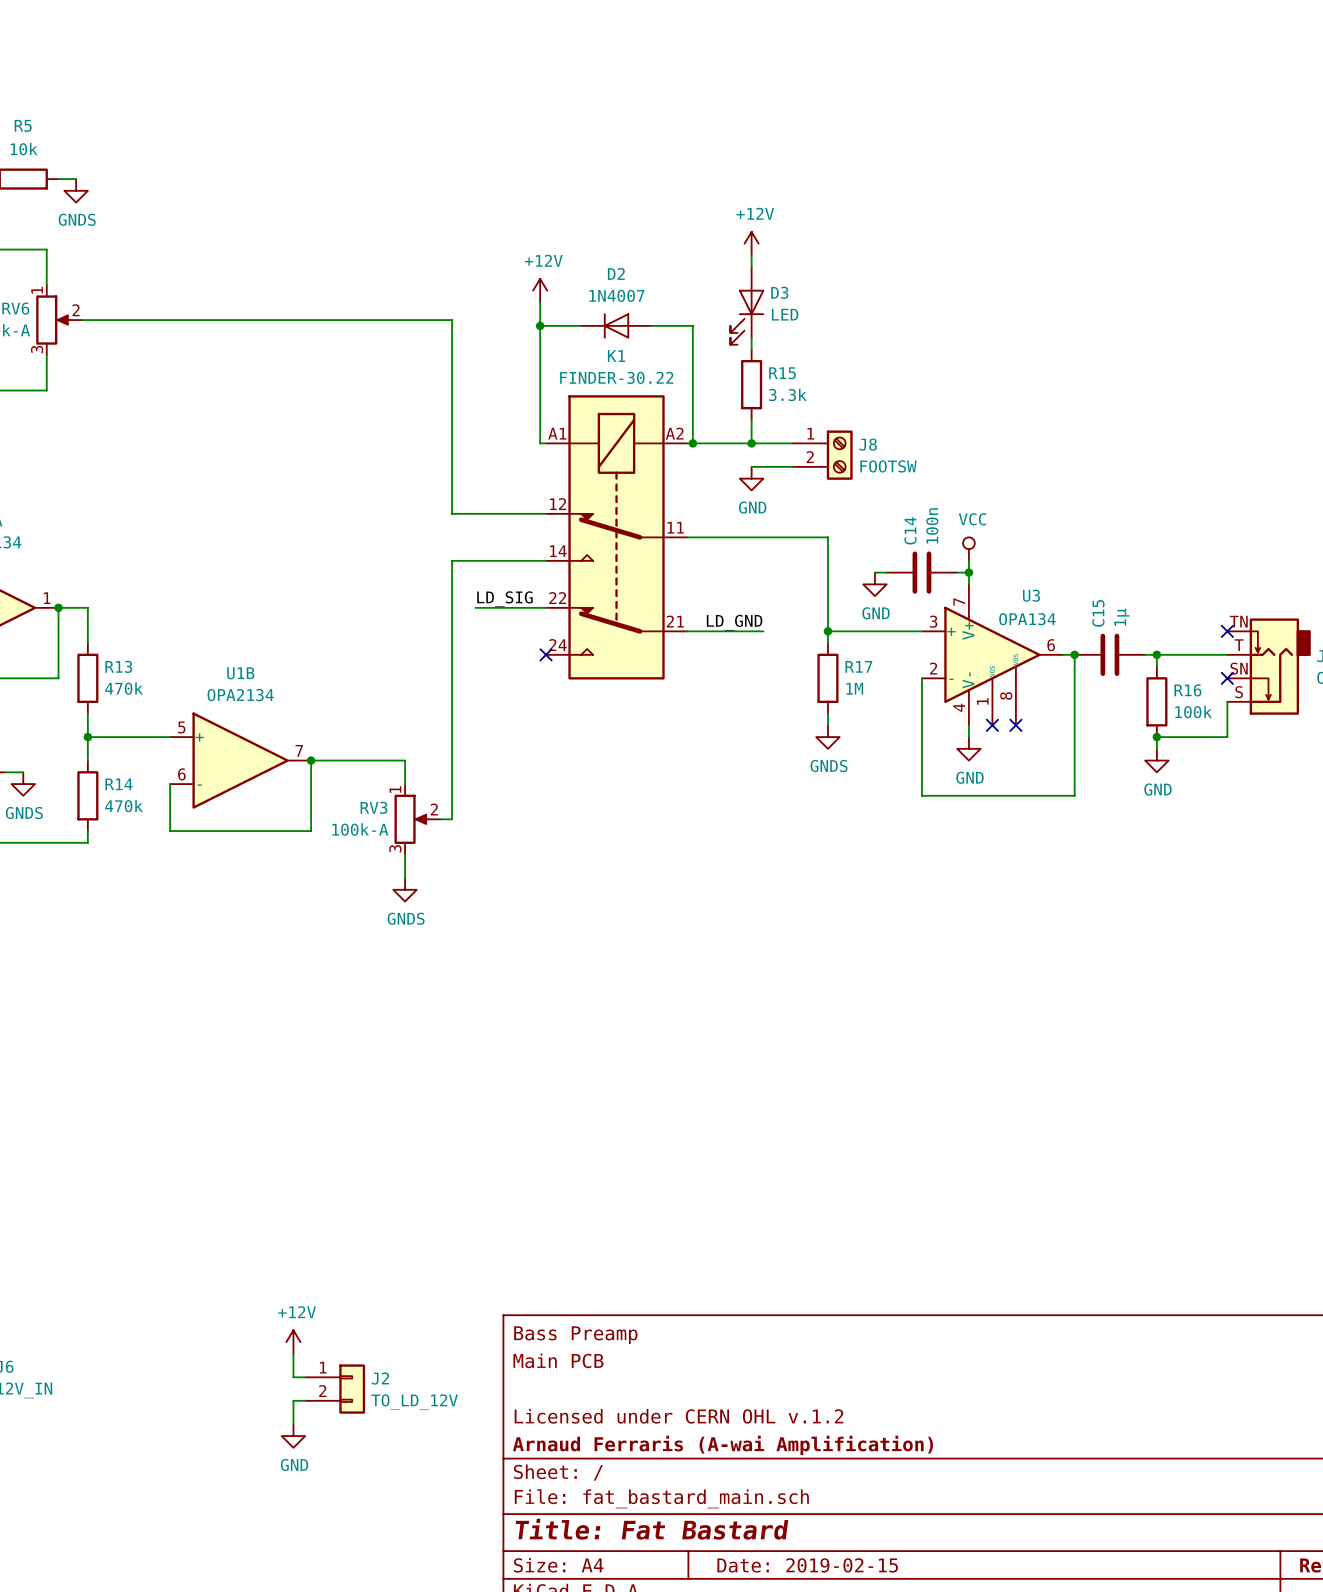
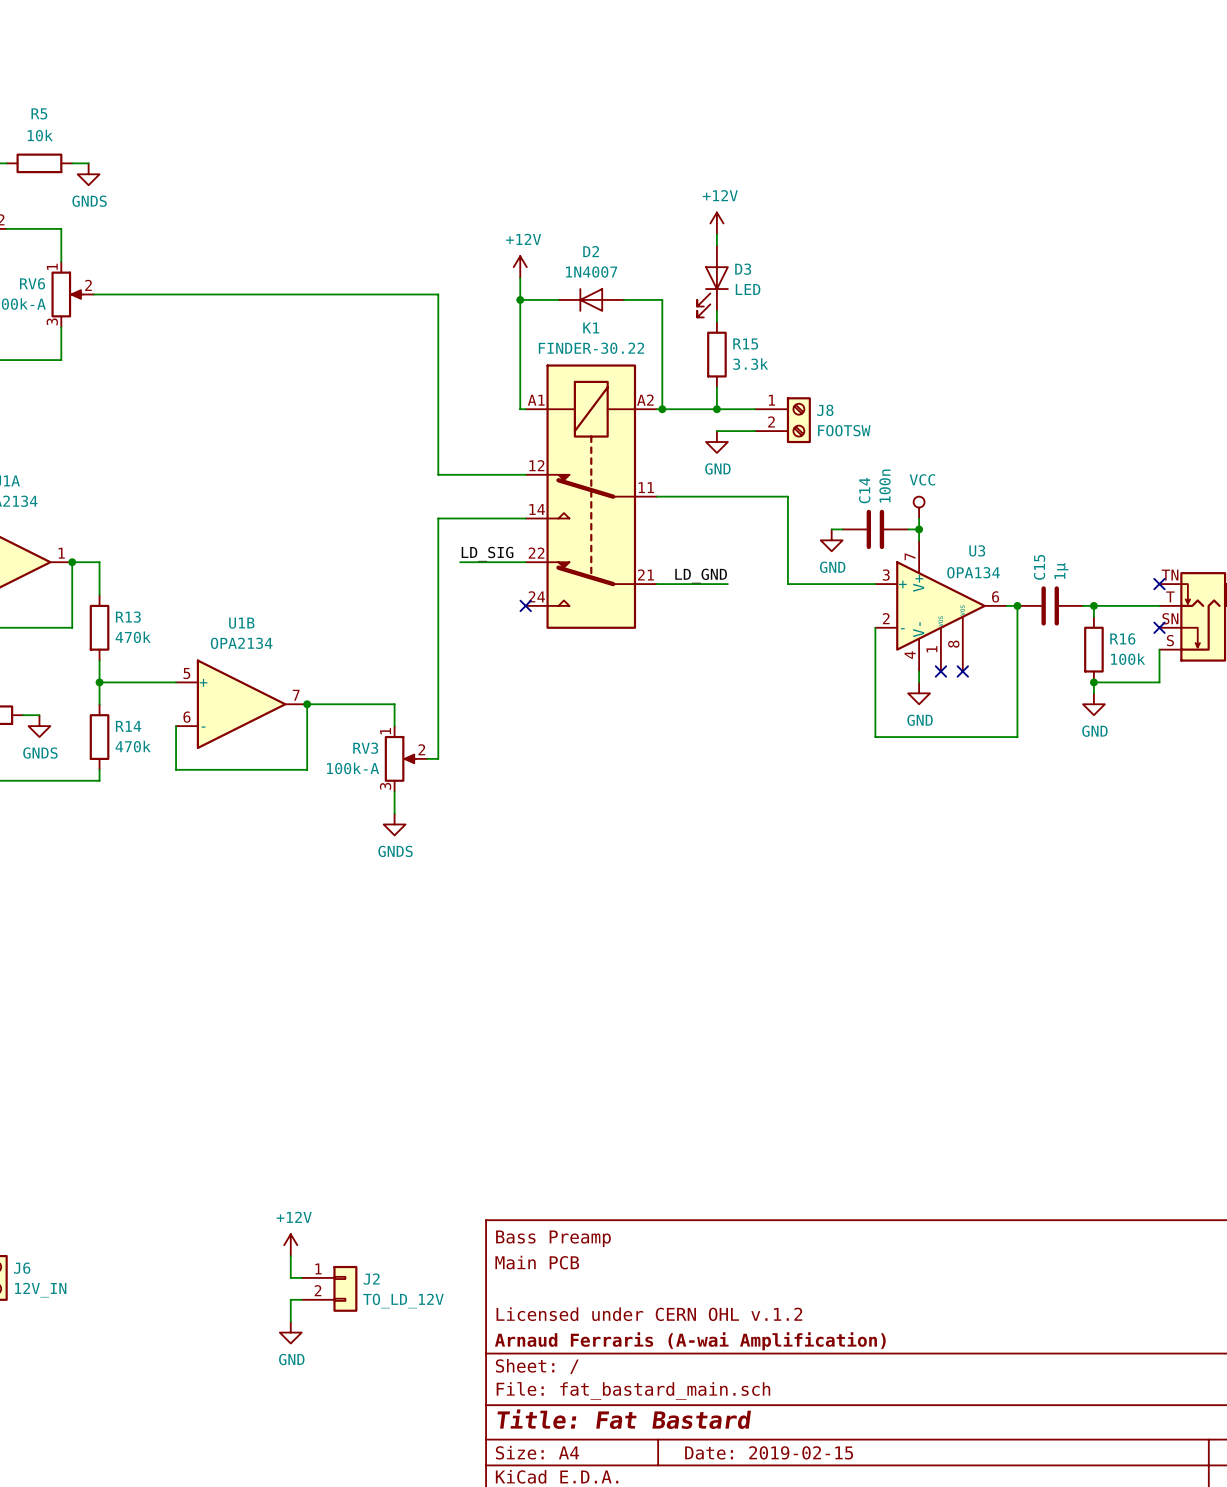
wire: (827, 631) (827, 643) -> none
junction: (827, 631) -> none
R17: 1M (827, 678) -> none
wire: (827, 713) (827, 725) -> none
power symbol: GNDS (827, 737) -> none

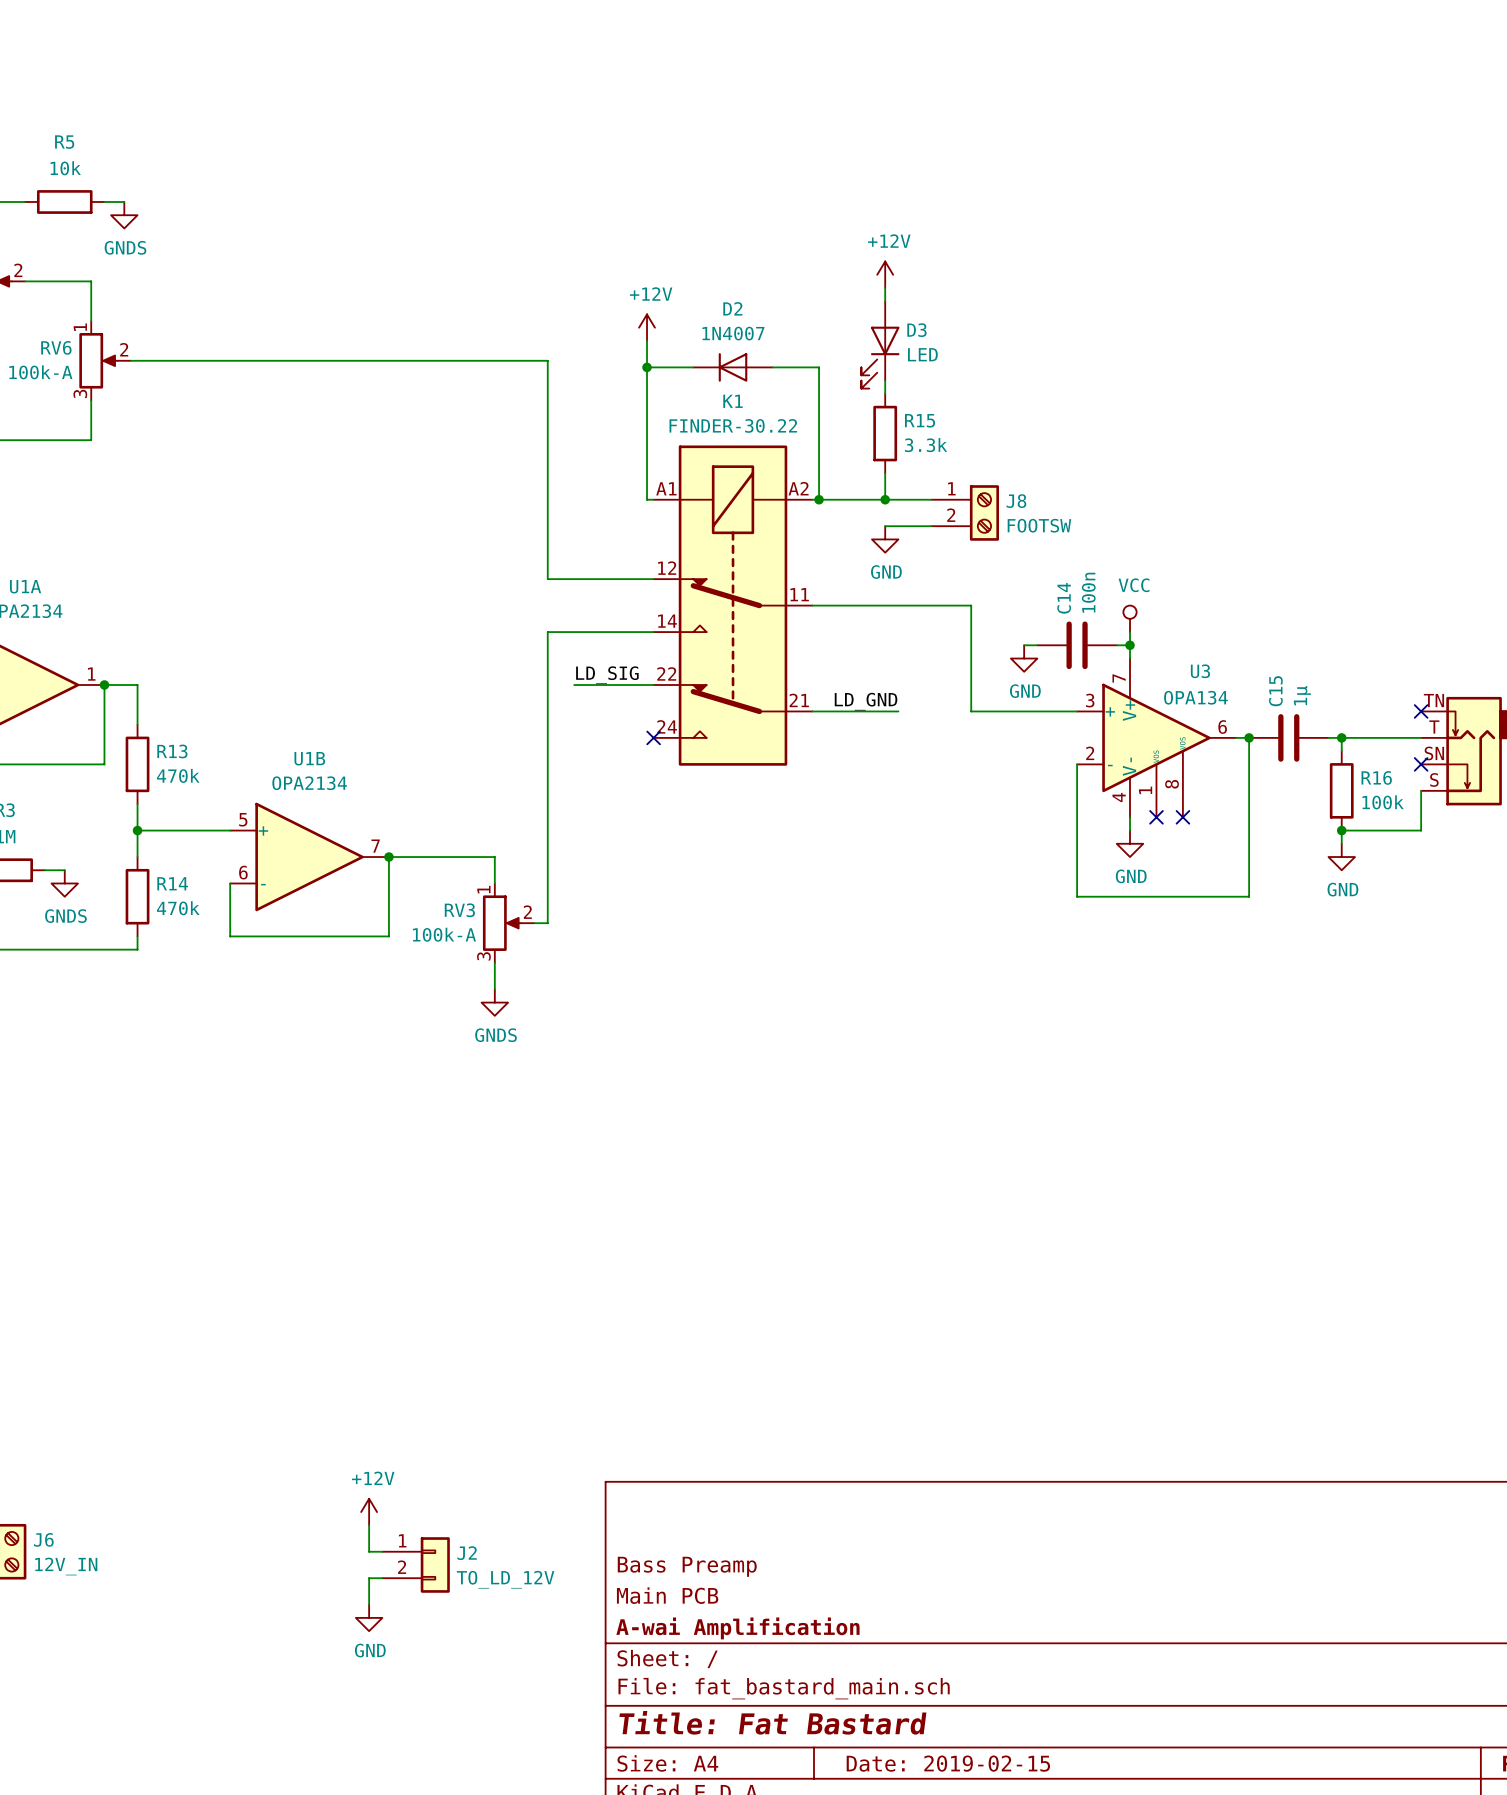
title block position: Bass Preamp (553, 1238) -> Bass Preamp (687, 1566)
title block: Main PCB (537, 1262) -> none
title block: Licensed under CERN OHL v.1.2 (649, 1314) -> Main PCB (667, 1595)
title block: Arnaud Ferraris (A-wai Amplification) (690, 1341) -> A-wai Amplification (737, 1628)

